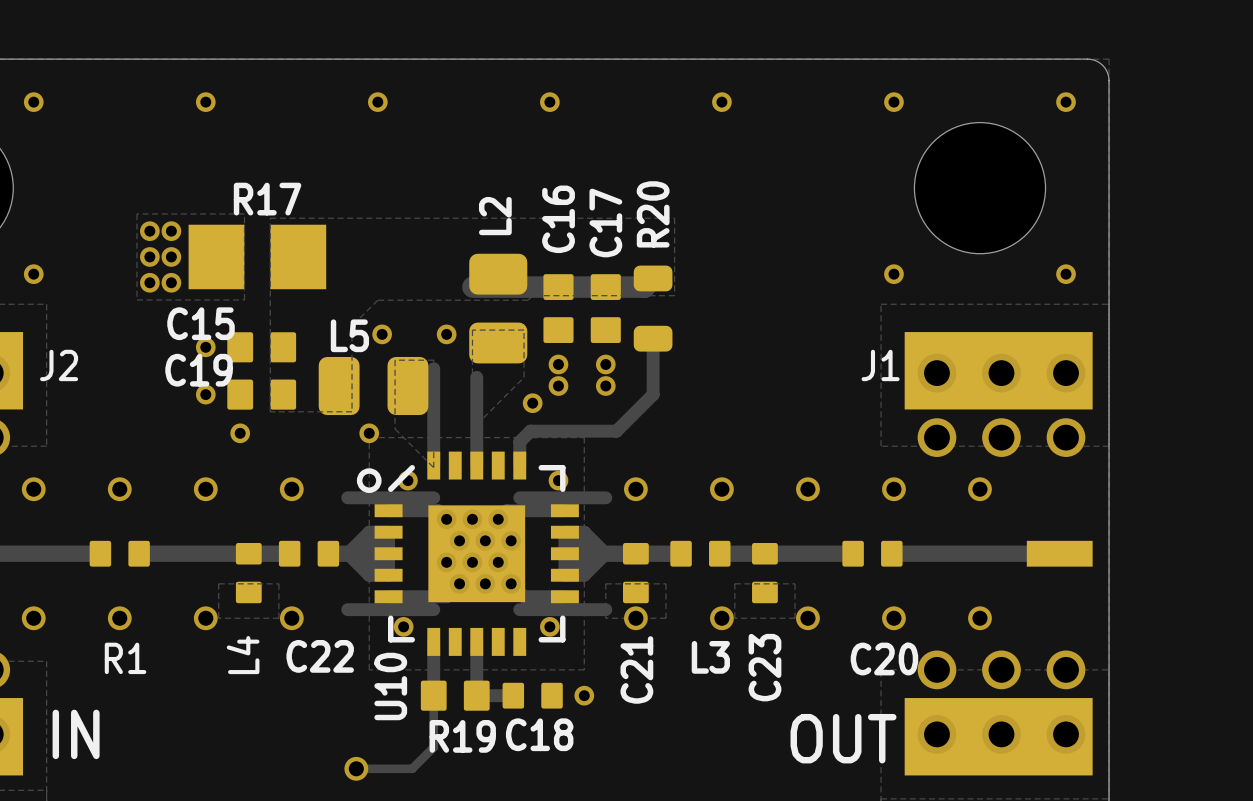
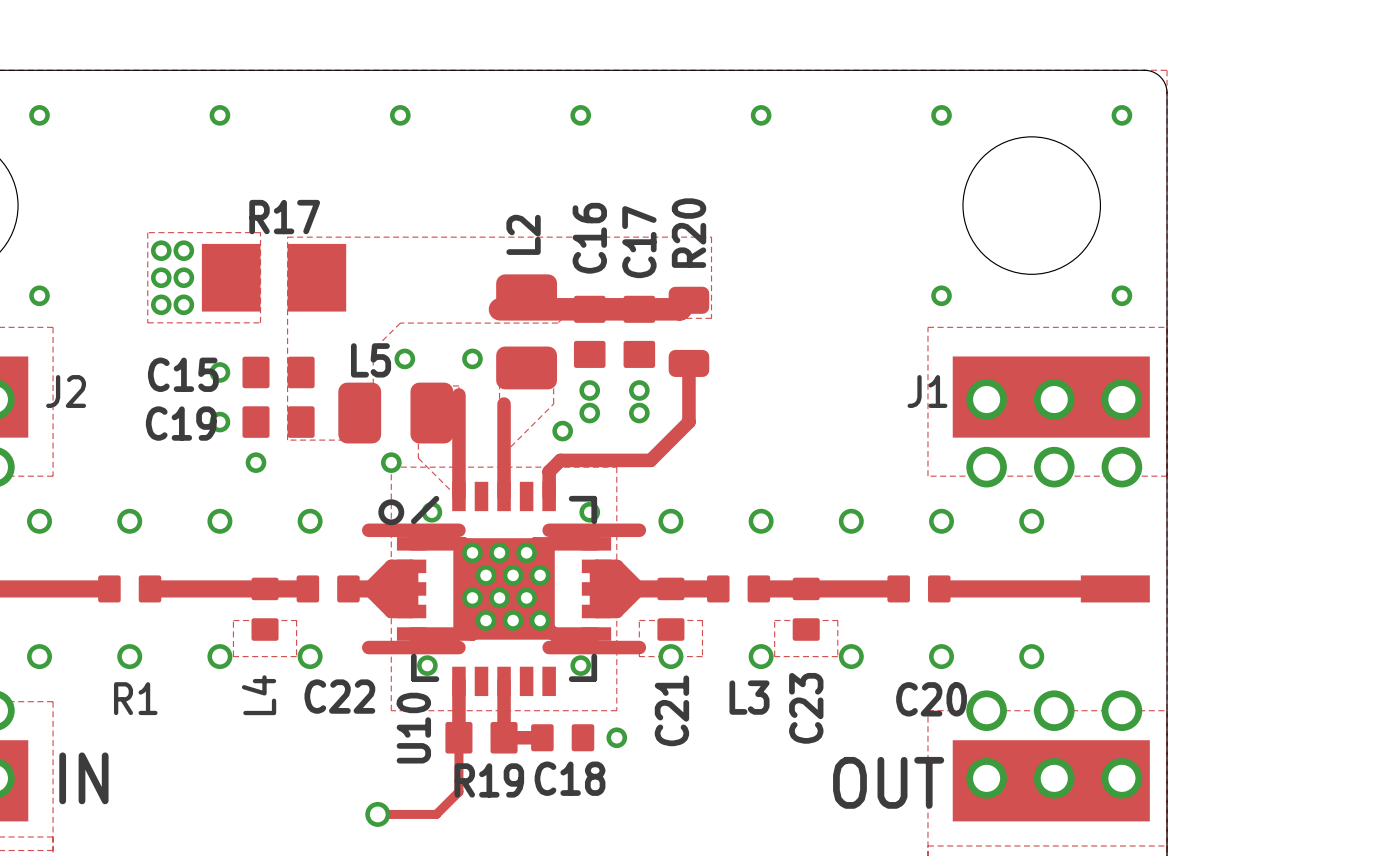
C15 name position: C15 (201, 323) -> C15 (183, 374)
C19 name position: C19 (199, 370) -> C19 (181, 423)

